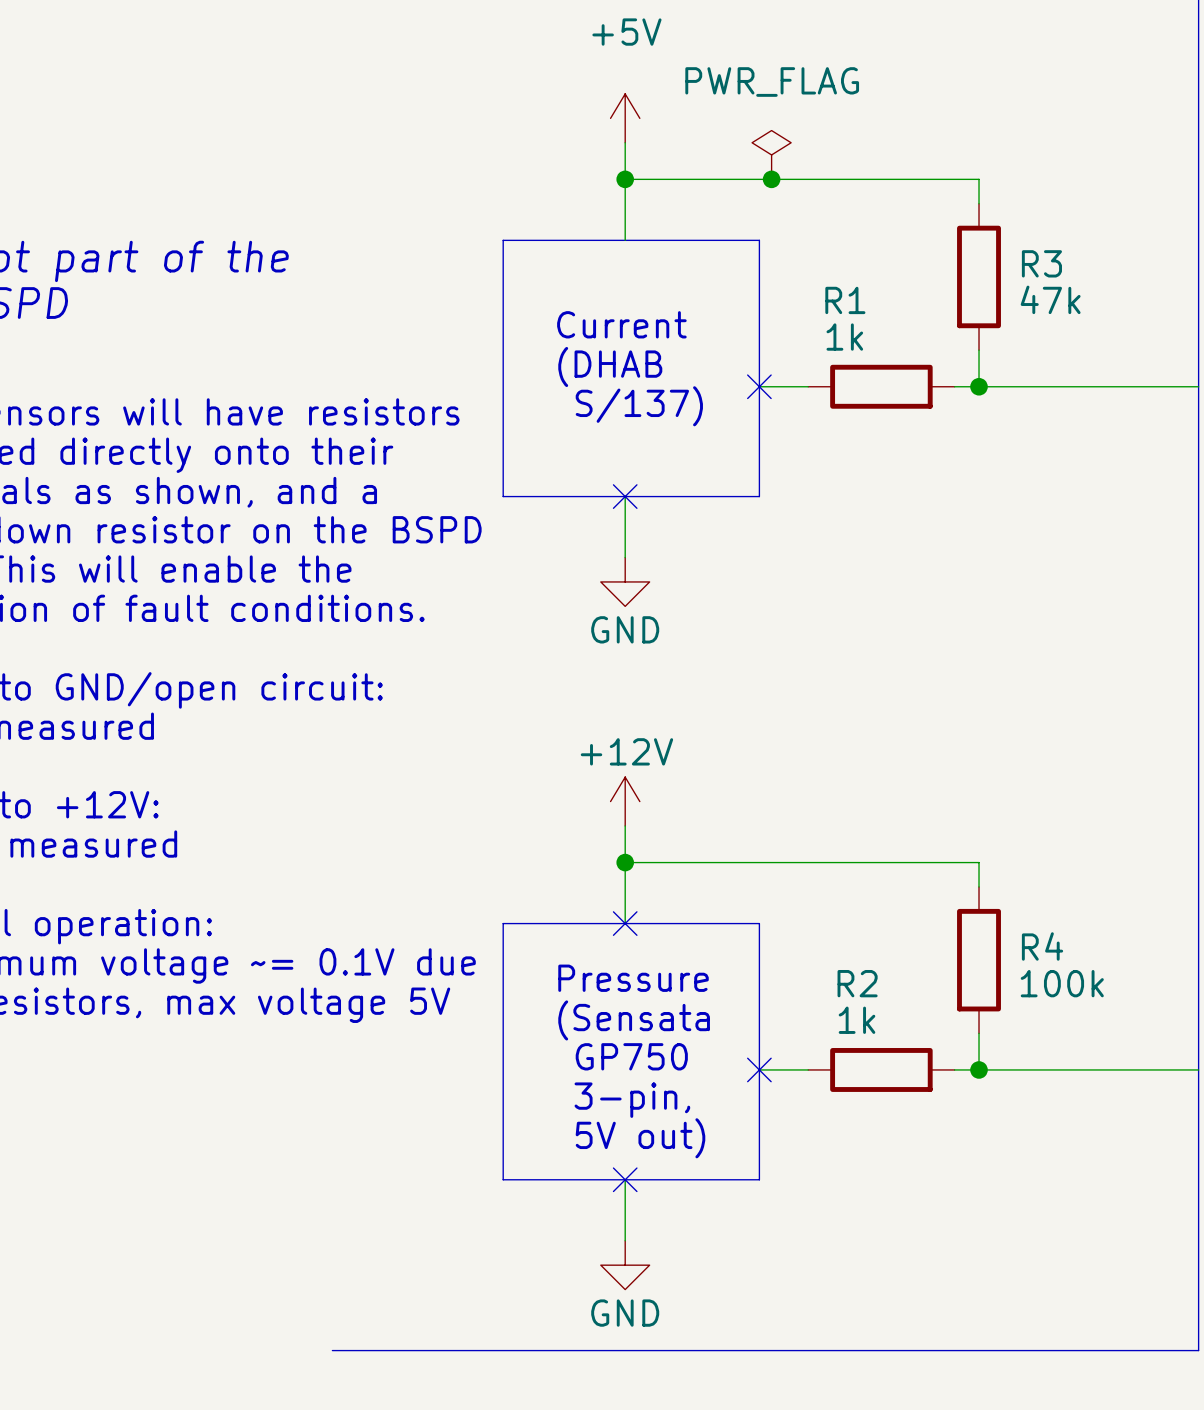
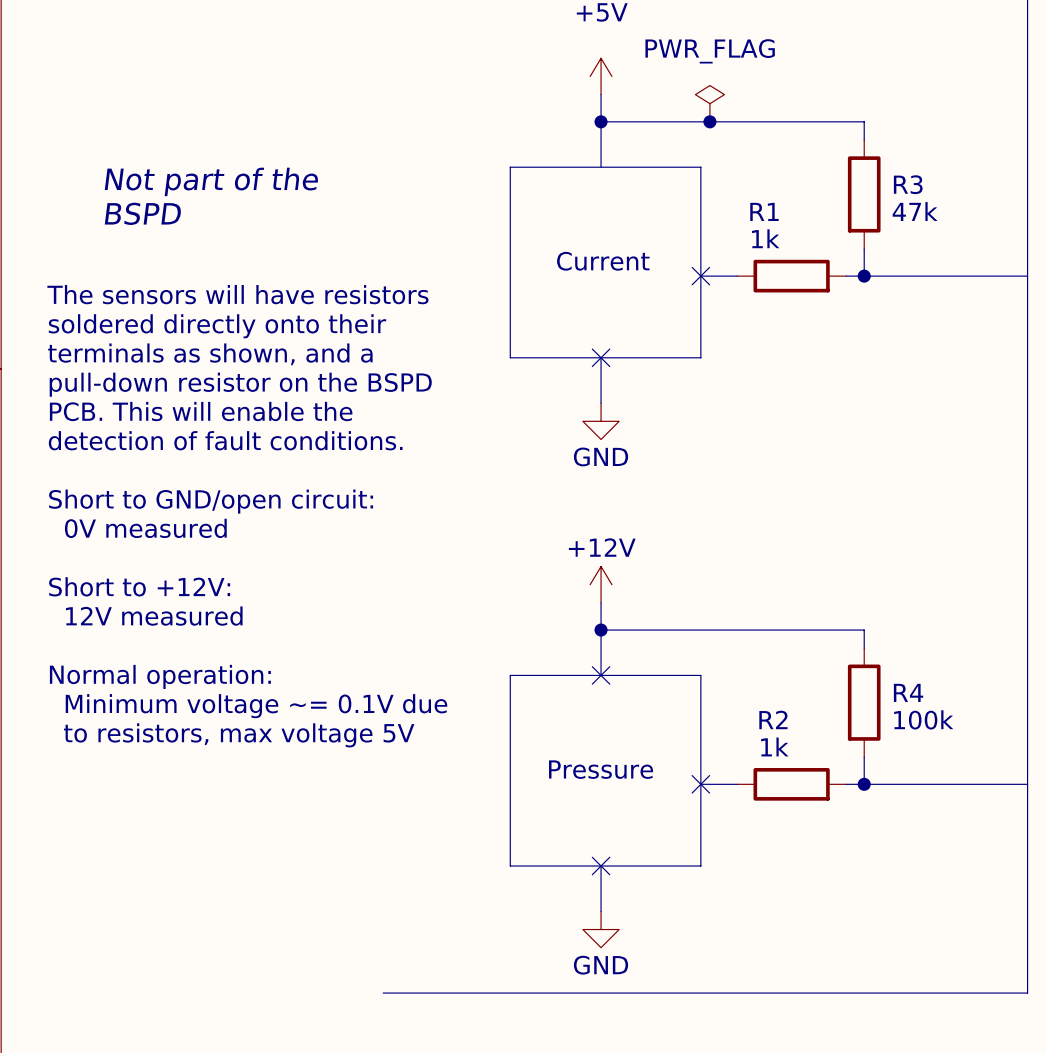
text position: Current (621, 324) -> Current (603, 261)
text: (DHAB (610, 366) -> none
text: S/137) (639, 406) -> none
text position: Pressure (633, 978) -> Pressure (601, 769)
text: (Sensata (634, 1020) -> none
text: GP750 (631, 1056) -> none
text: 3-pin, (632, 1100) -> none
text: 5V out) (640, 1138) -> none

